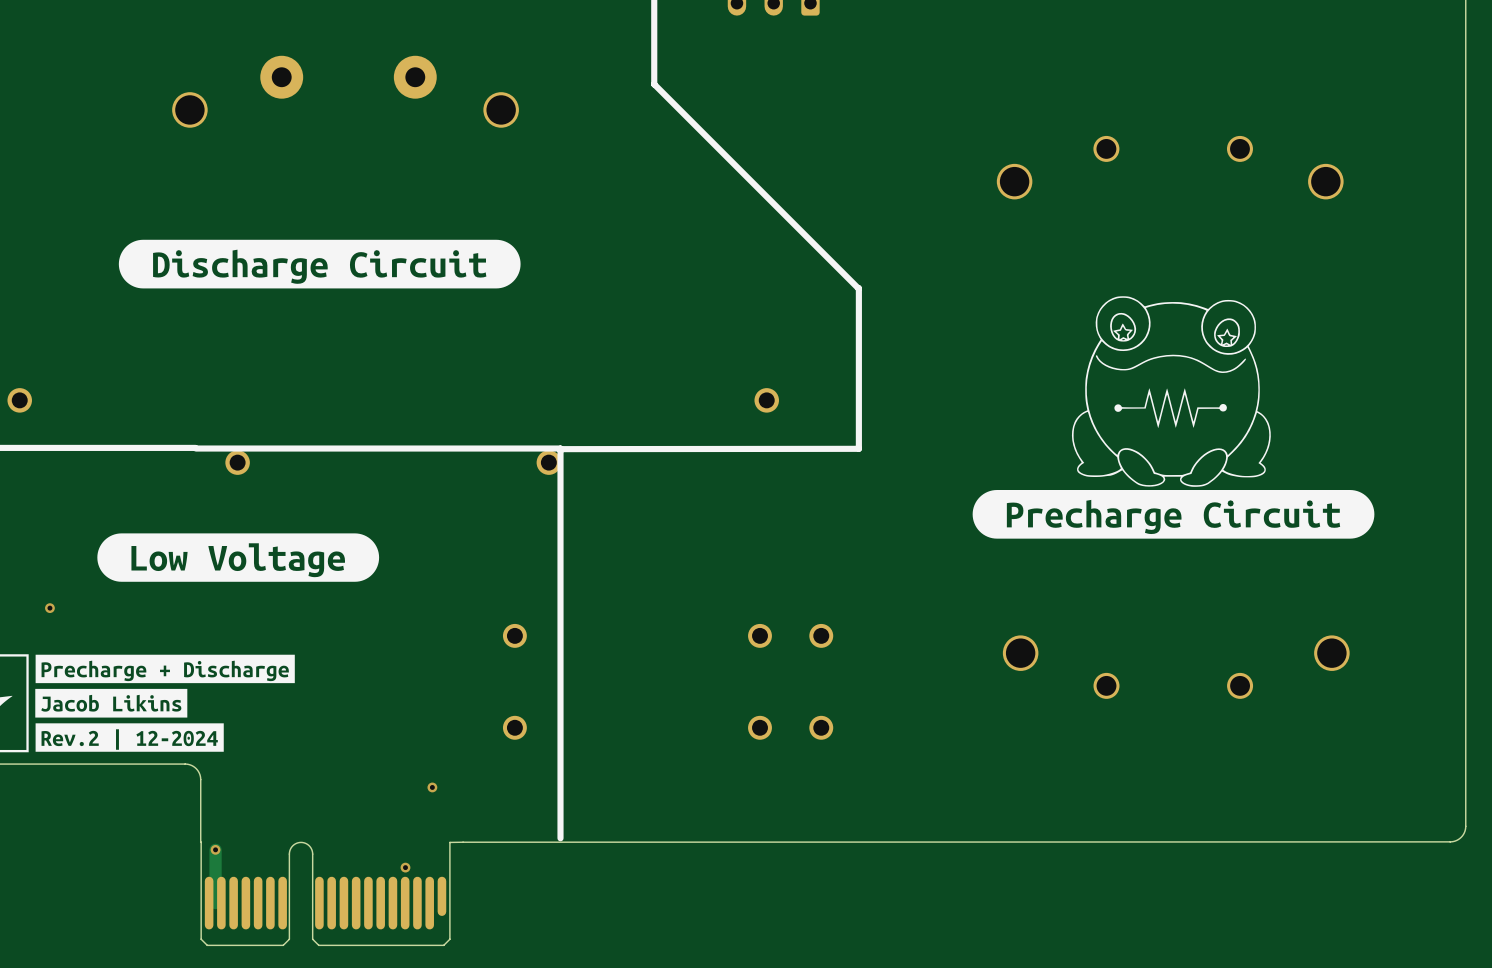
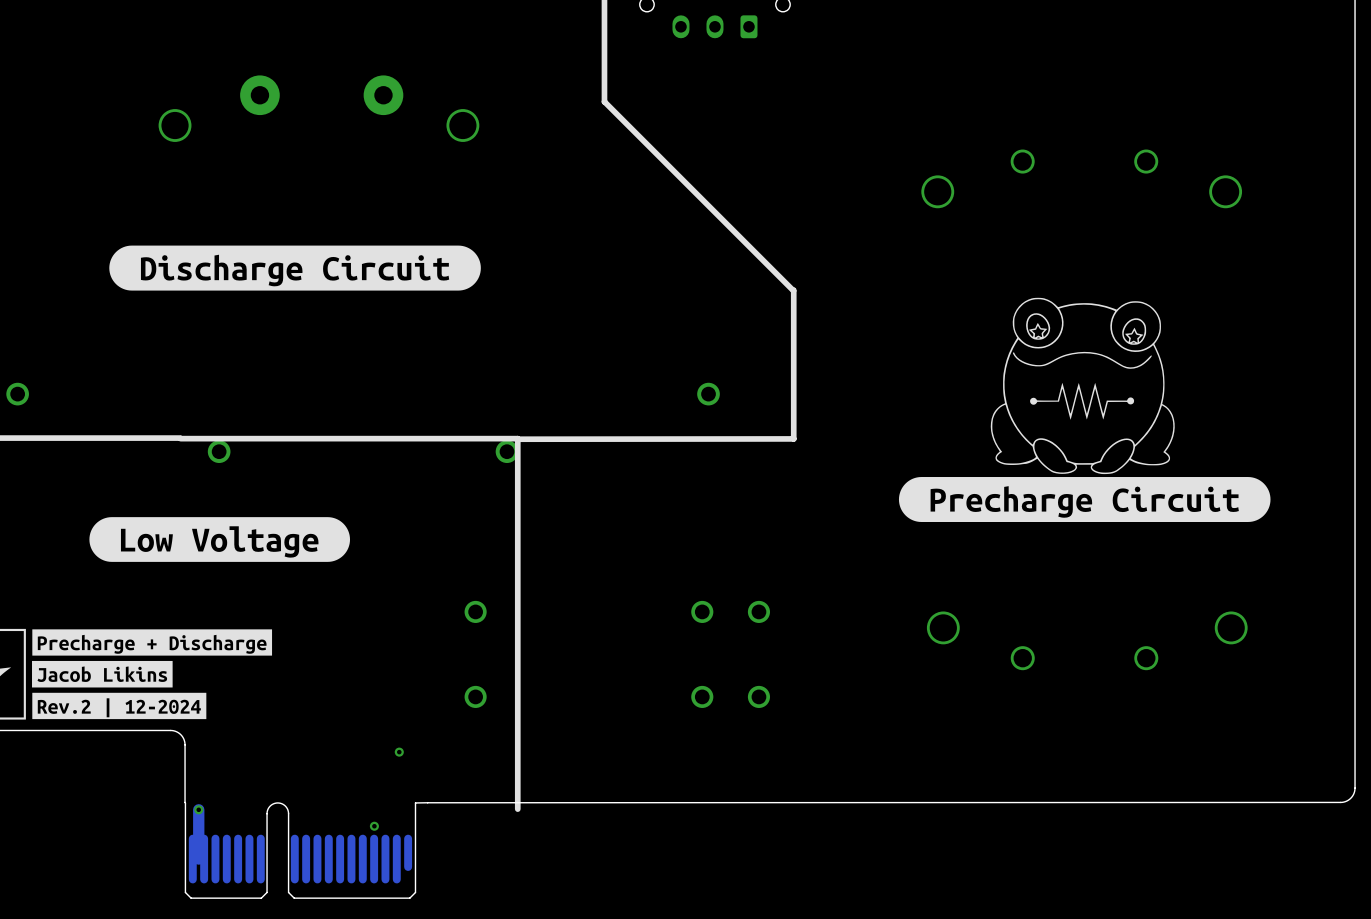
via: (49, 608) -> none
line: none -> (517, 799) (517, 809)

